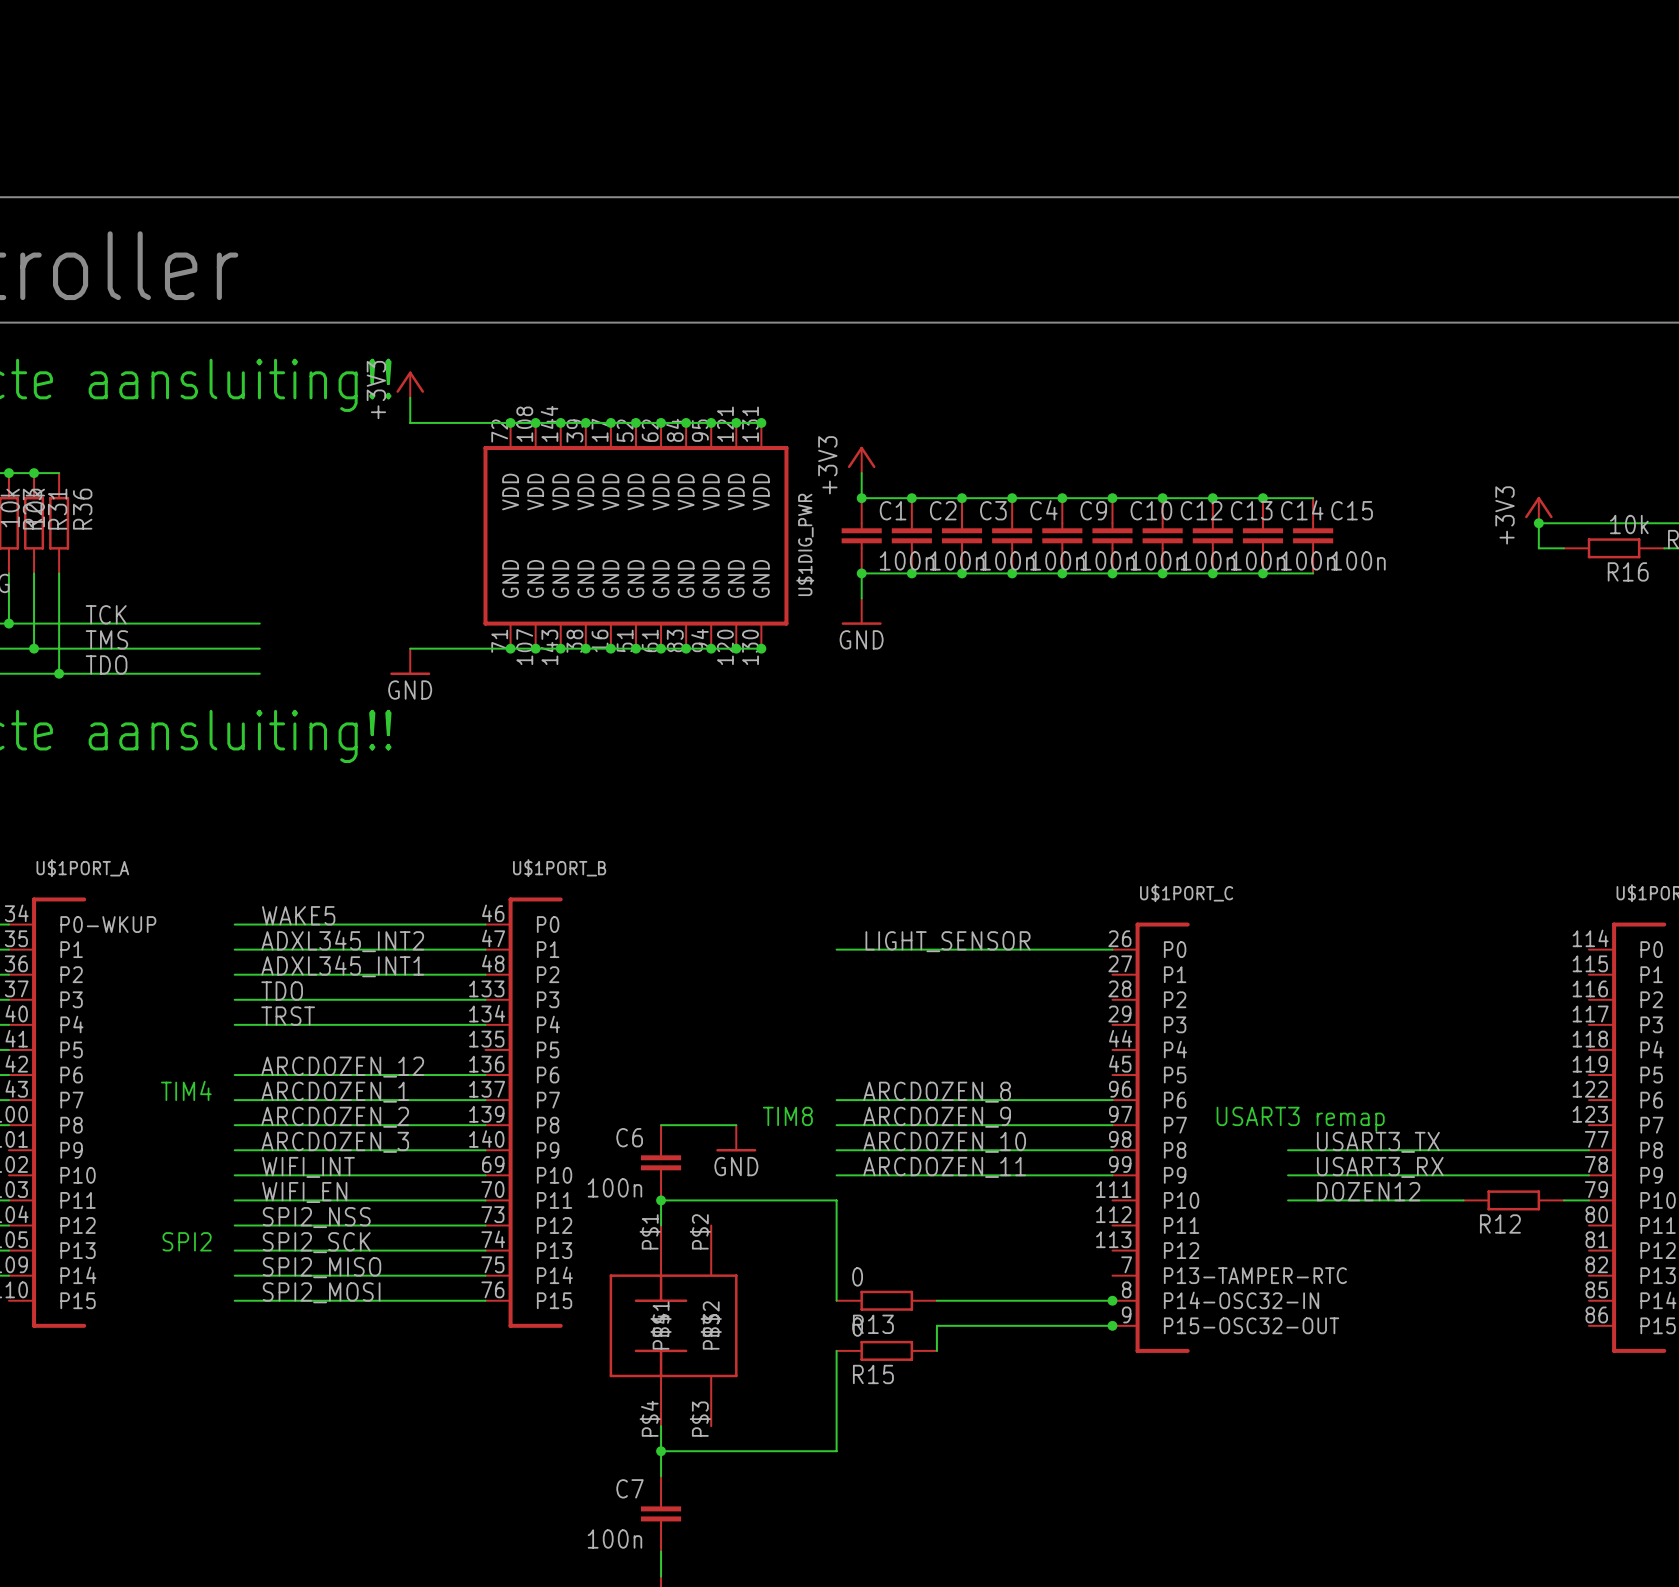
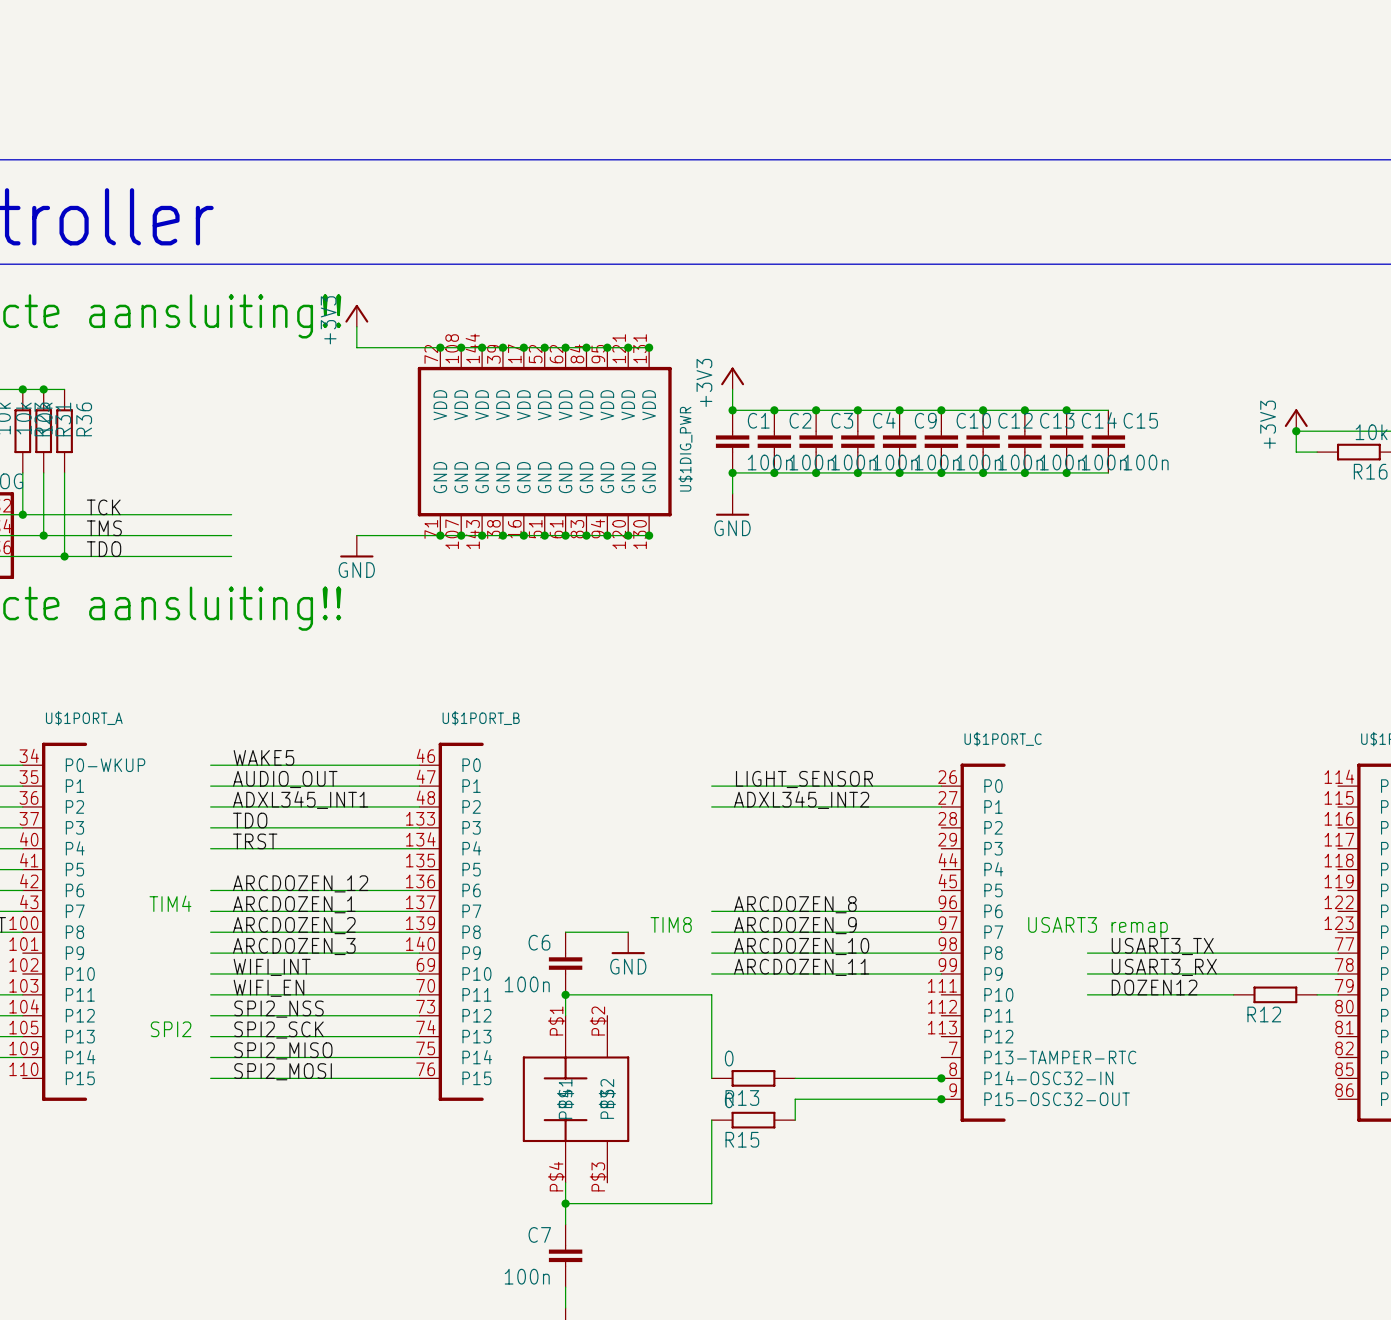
label: ADXL345_INT2 (342, 941) -> AUDIO_OUT (285, 779)
label: none -> ADXL345_INT2 (801, 800)
wire: none -> (711, 806) (941, 806)

